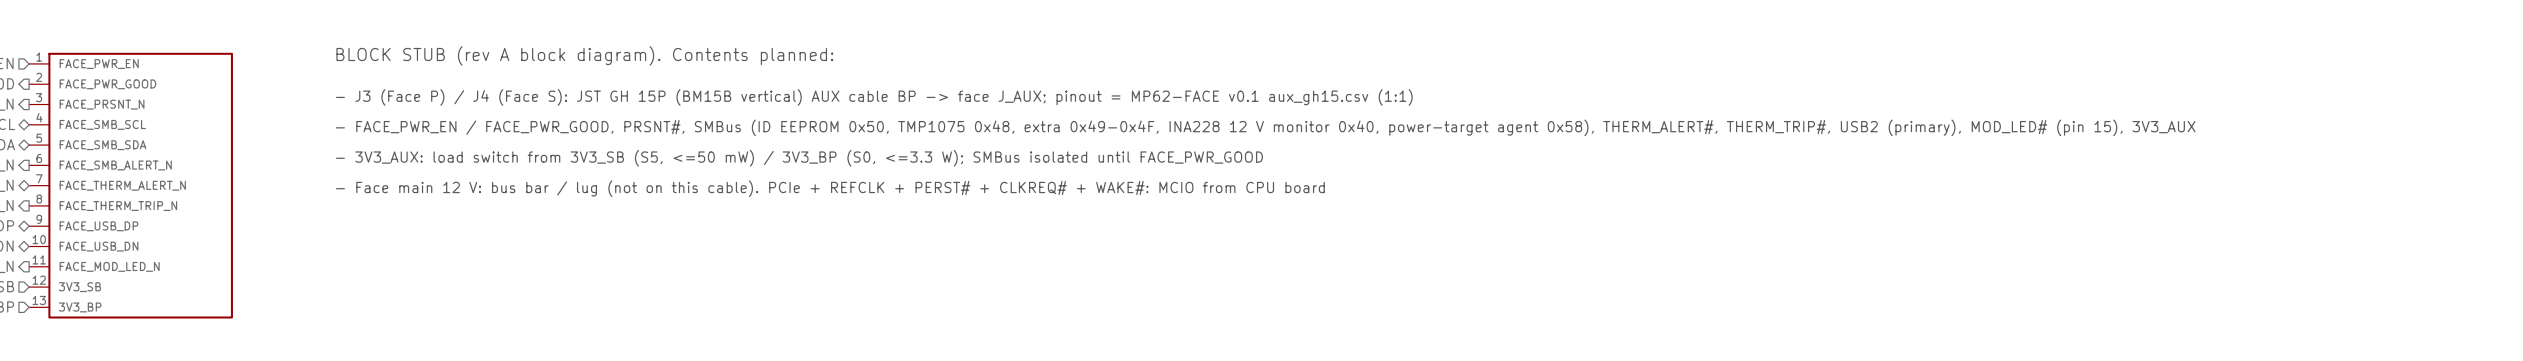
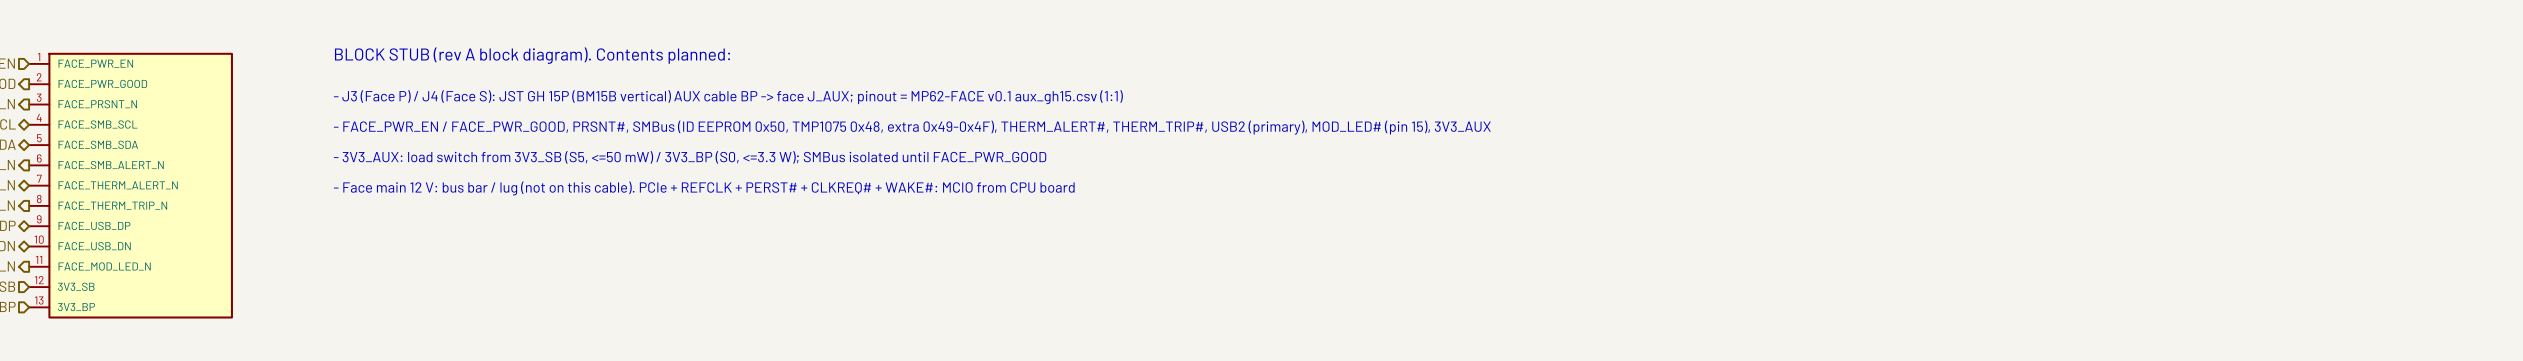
text: - FACE_PWR_EN / FACE_PWR_GOOD, PRSNT#, SMBus (ID EEPROM 0x50, TMP1075 0x48, extra 0x49-0x4F, INA228 12 V monitor 0x40, power-target agent 0x58), THERM_ALERT#, THERM_TRIP#, USB2 (primary), MOD_LED# (pin 15), 3V3_AUX (1265, 127) -> - FACE_PWR_EN / FACE_PWR_GOOD, PRSNT#, SMBus (ID EEPROM 0x50, TMP1075 0x48, extra 0x49-0x4F), THERM_ALERT#, THERM_TRIP#, USB2 (primary), MOD_LED# (pin 15), 3V3_AUX (912, 127)

